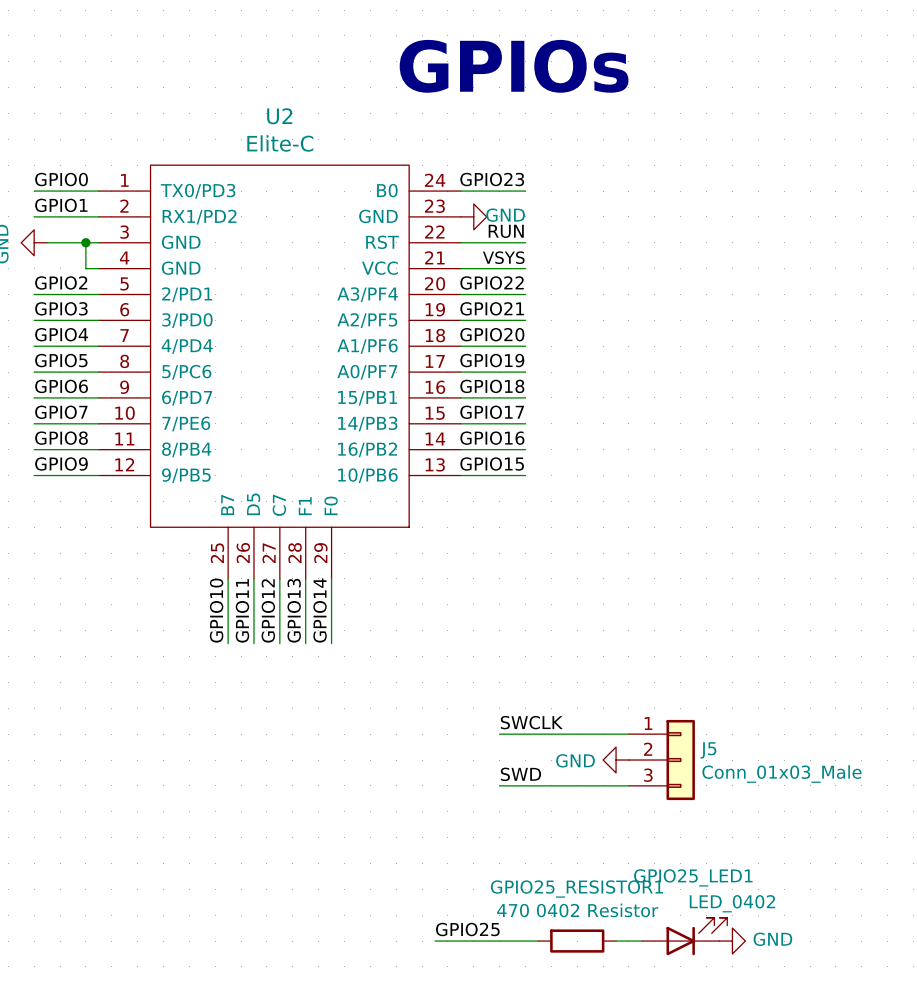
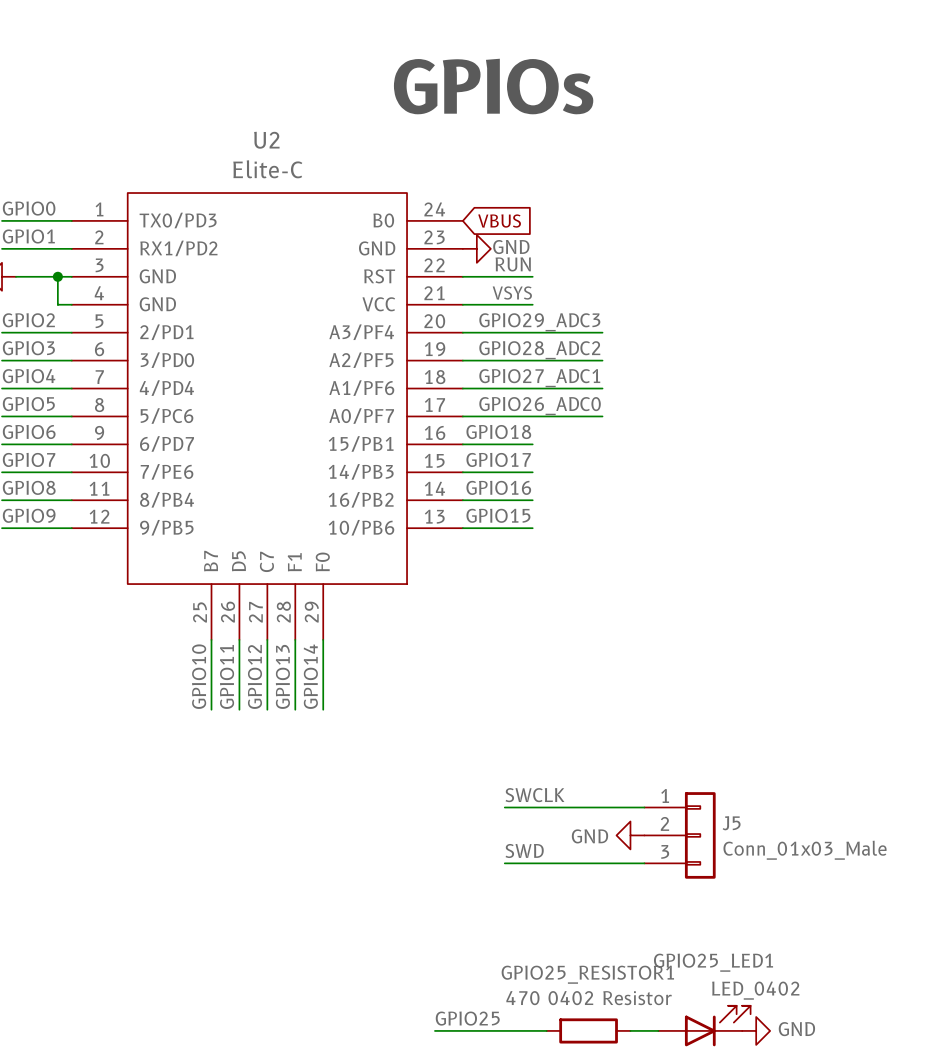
label: GPIO23 (492, 179) -> none
wire: (460, 191) (525, 191) -> (532, 332) (602, 332)
global label: none -> VBUS (499, 221)
label: GPIO22 (492, 282) -> GPIO28_ADC2 (539, 350)
label: none -> GPIO29_ADC3 (539, 322)
label: GPIO21 (492, 308) -> GPIO27_ADC1 (539, 378)
wire: none -> (532, 360) (602, 360)
label: GPIO20 (492, 334) -> GPIO26_ADC0 (540, 406)
wire: none -> (532, 388) (602, 388)
label: GPIO19 (492, 360) -> none
wire: none -> (532, 416) (602, 416)

